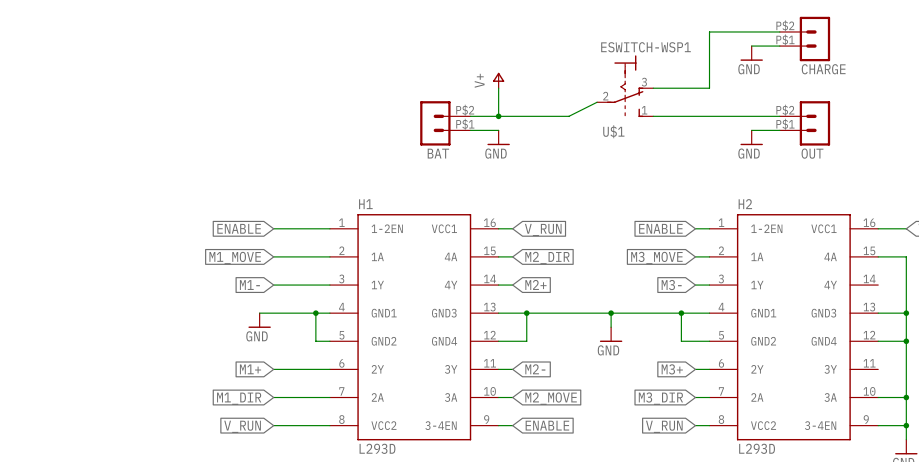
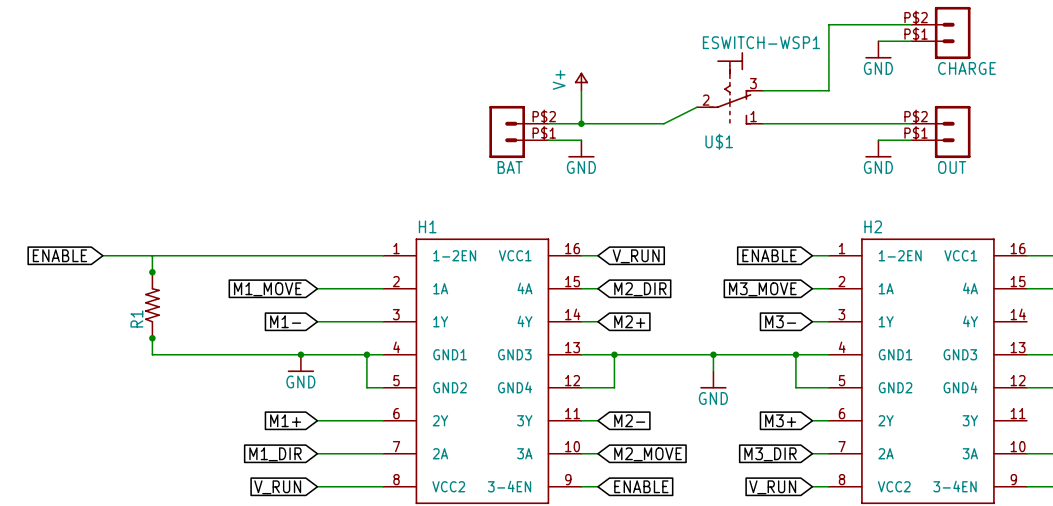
global label: none -> ENABLE (59, 255)
wire: none -> (102, 255) (317, 255)
wire: none -> (152, 255) (152, 272)
global label: ENABLE (239, 228) -> none
junction: none -> (152, 272)
R1: none -> (152, 305)
wire: none -> (152, 338) (152, 354) (300, 354)
junction: none -> (152, 338)
junction: none -> (300, 354)

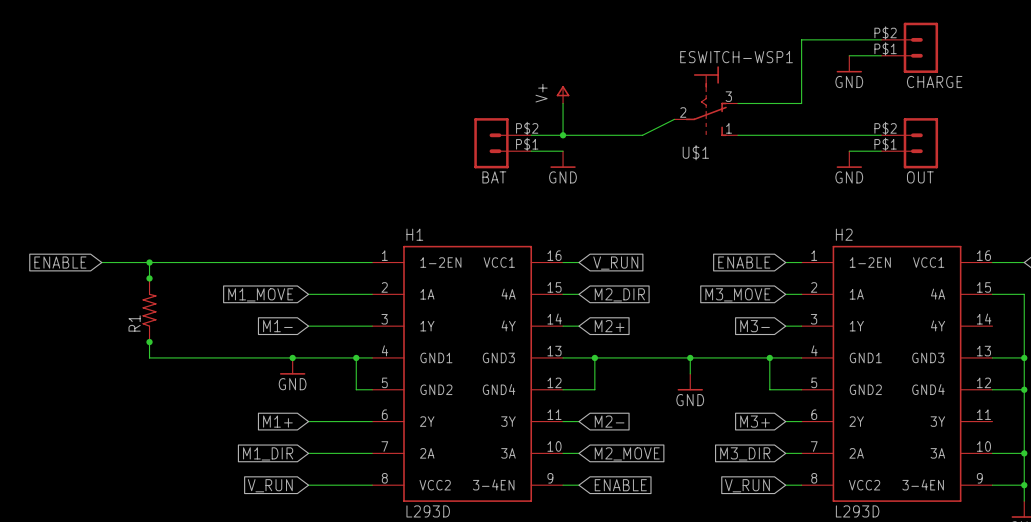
junction: none -> (149, 262)

